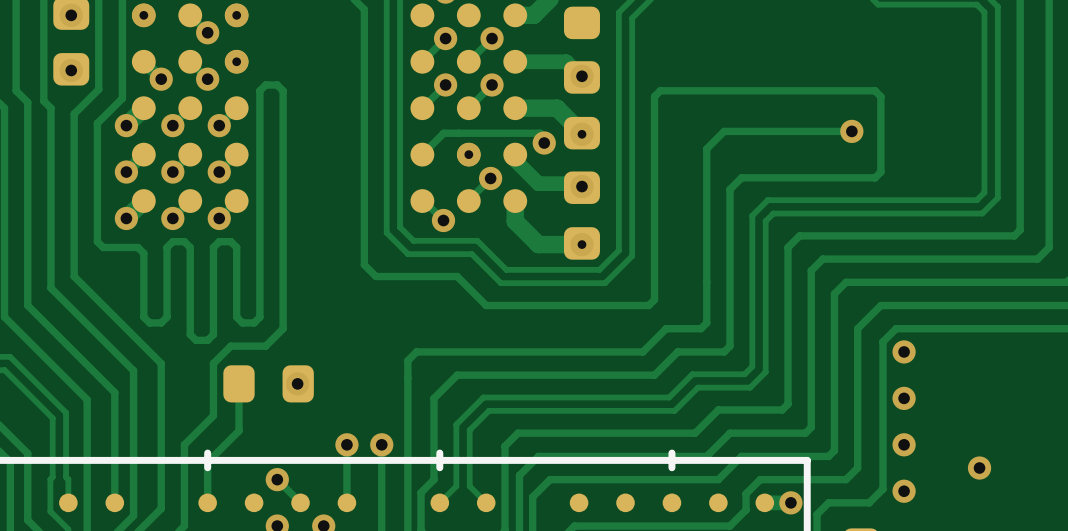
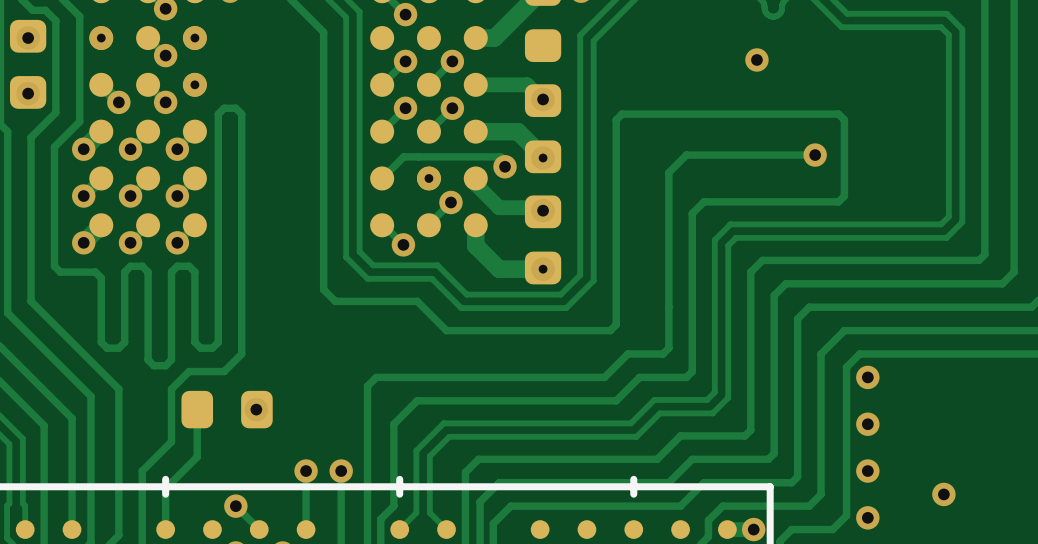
via: none -> (756, 59)

